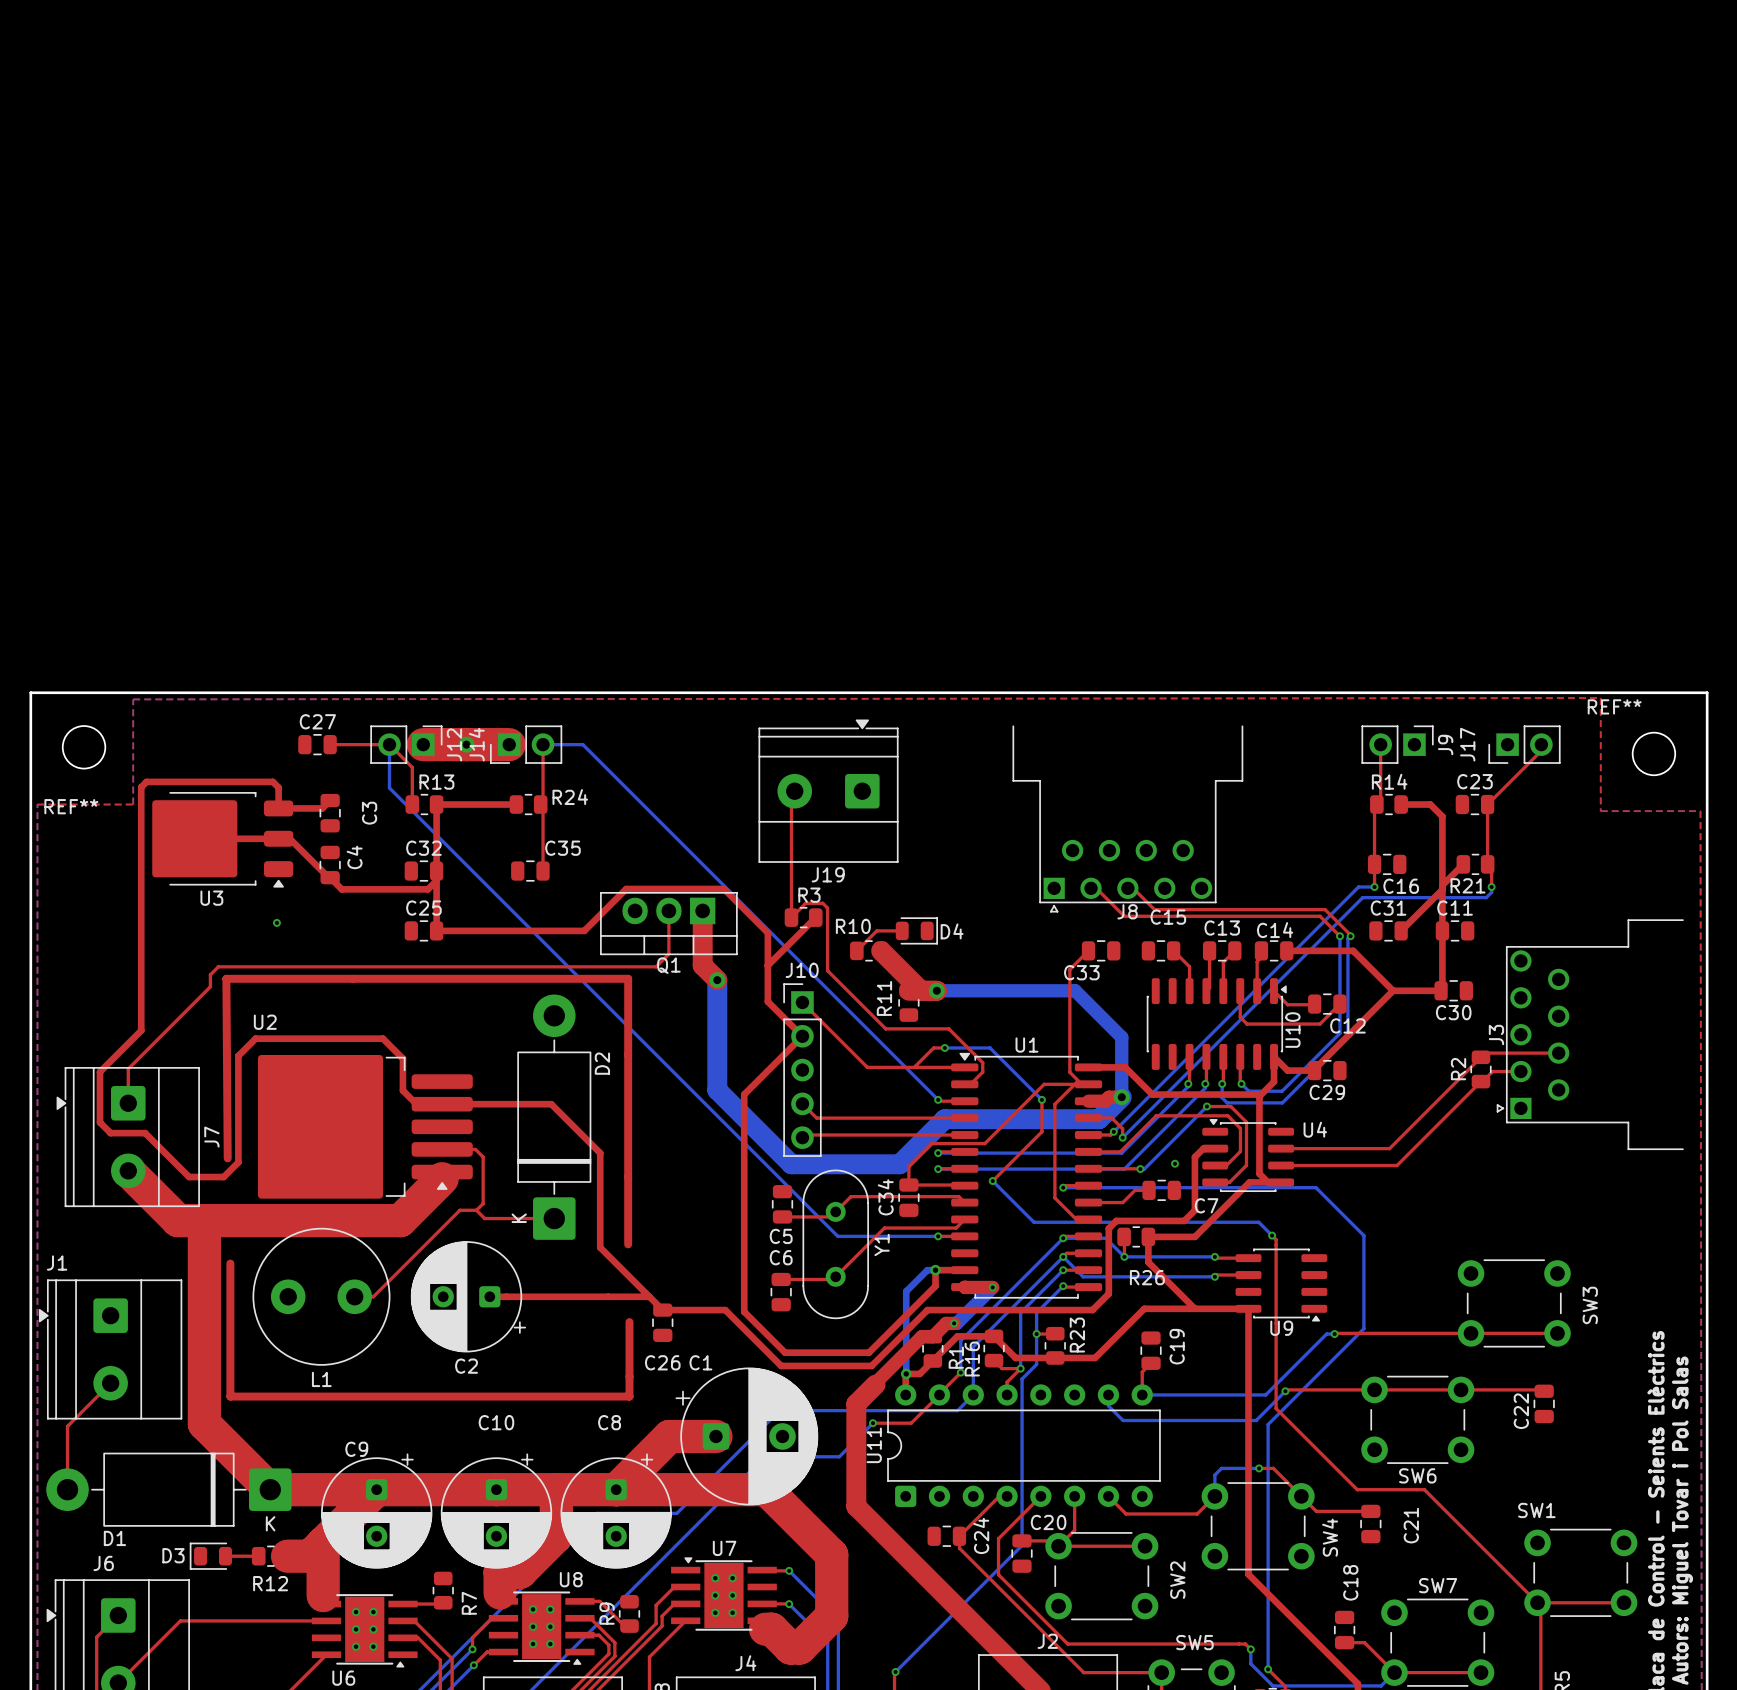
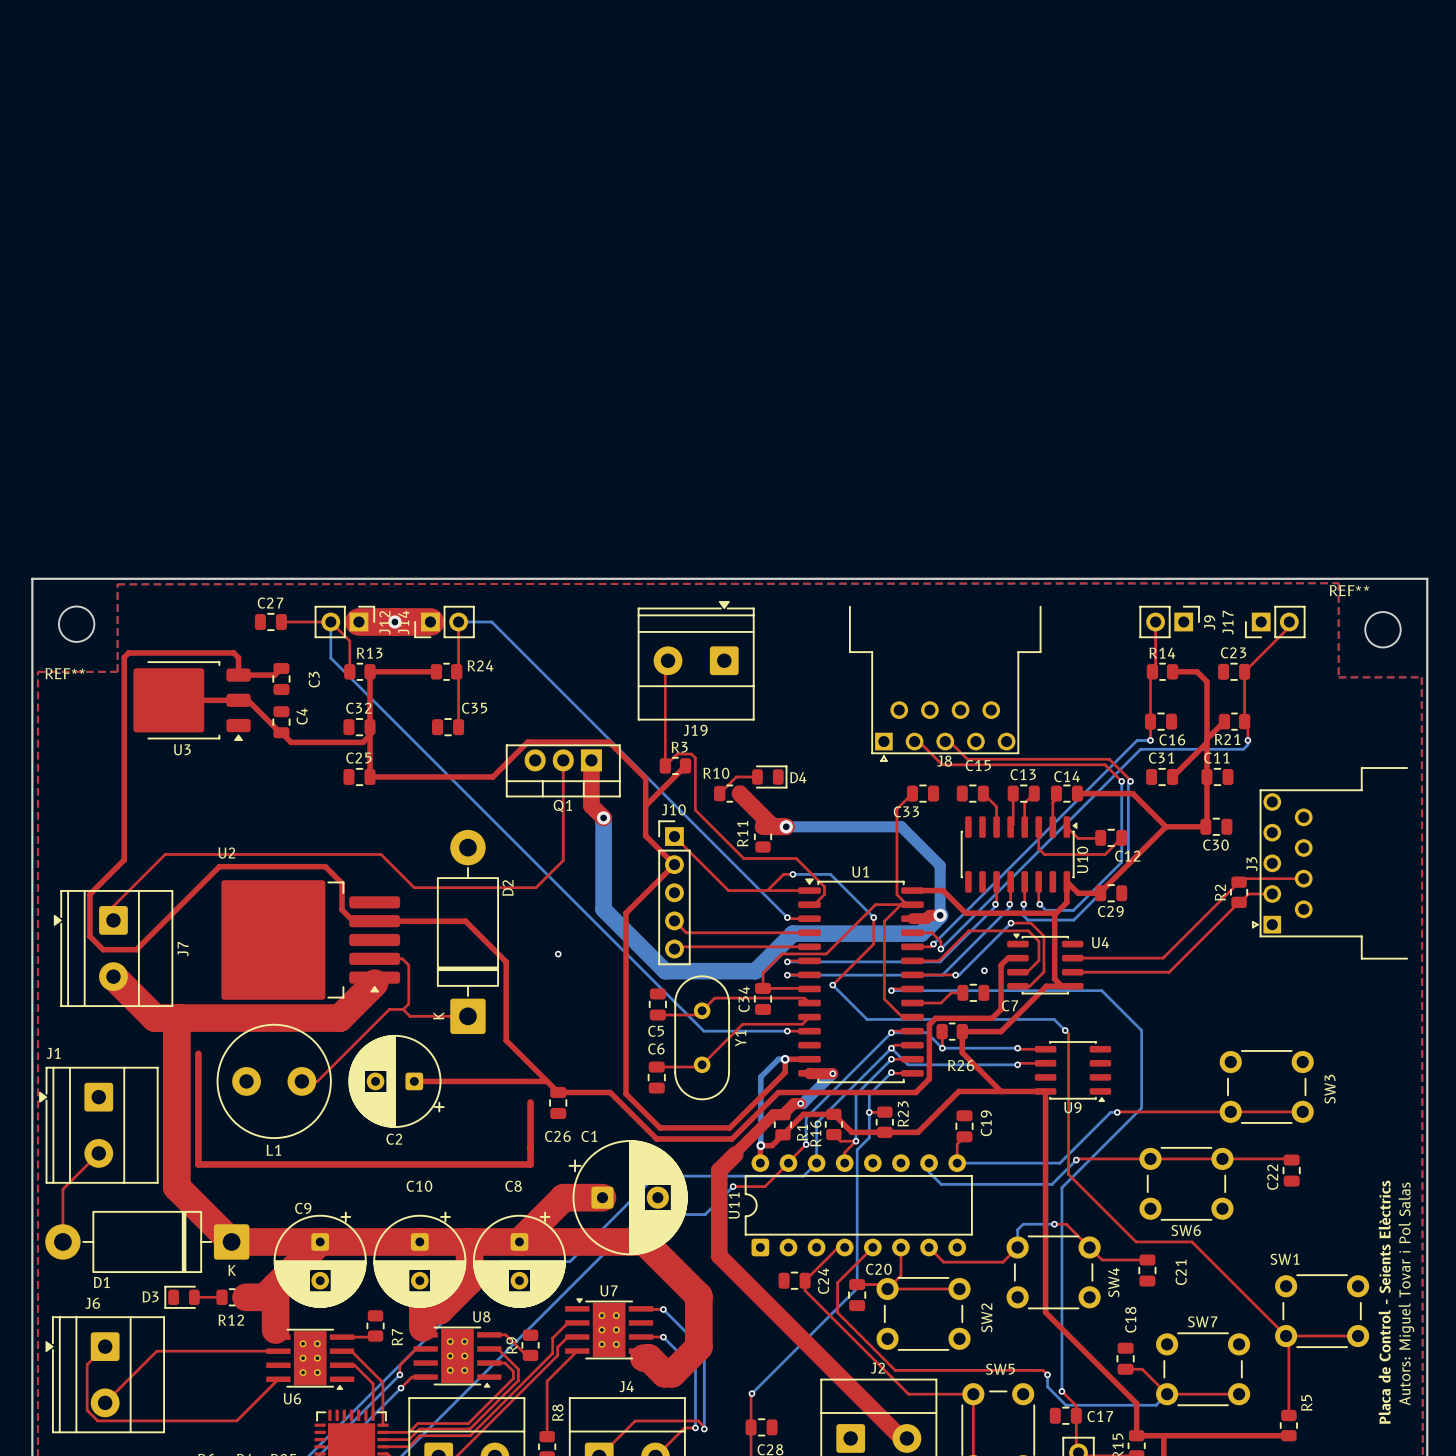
via: (276, 922) -> none
top track: (668, 954) (656, 966) (218, 966) (210, 974) (210, 986) (128, 1068) (128, 1086) -> (563, 796) (563, 860) (536, 887) (414, 887) (381, 854) (165, 854) (113, 906)
top track: (238, 1055) (238, 1162) (223, 1177) (189, 1177) (145, 1133) (110, 1133) -> (205, 881) (136, 949) (103, 949) (98, 945)
via: none -> (558, 954)
top track: (227, 1158) (226, 978) (628, 978) (628, 1244) -> none

